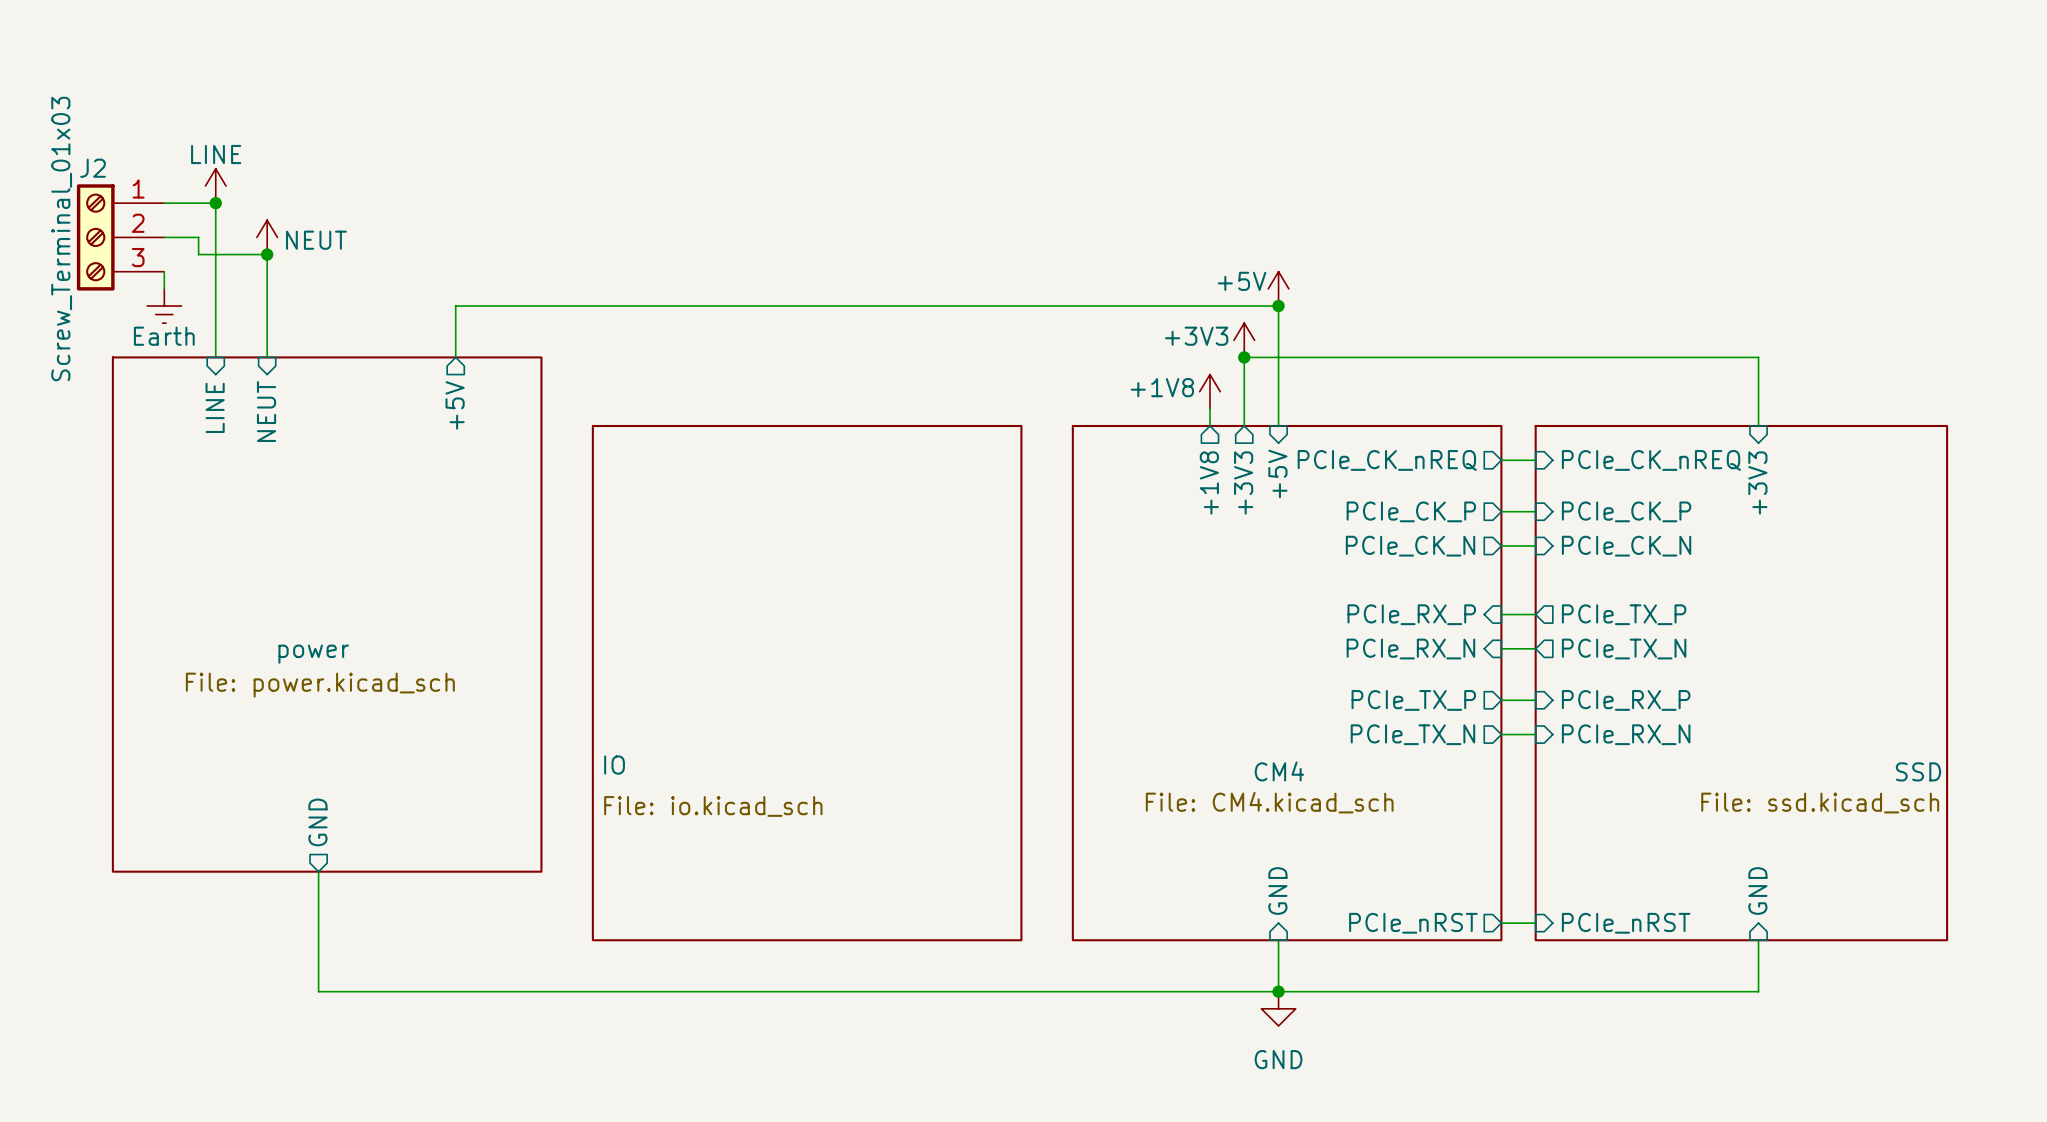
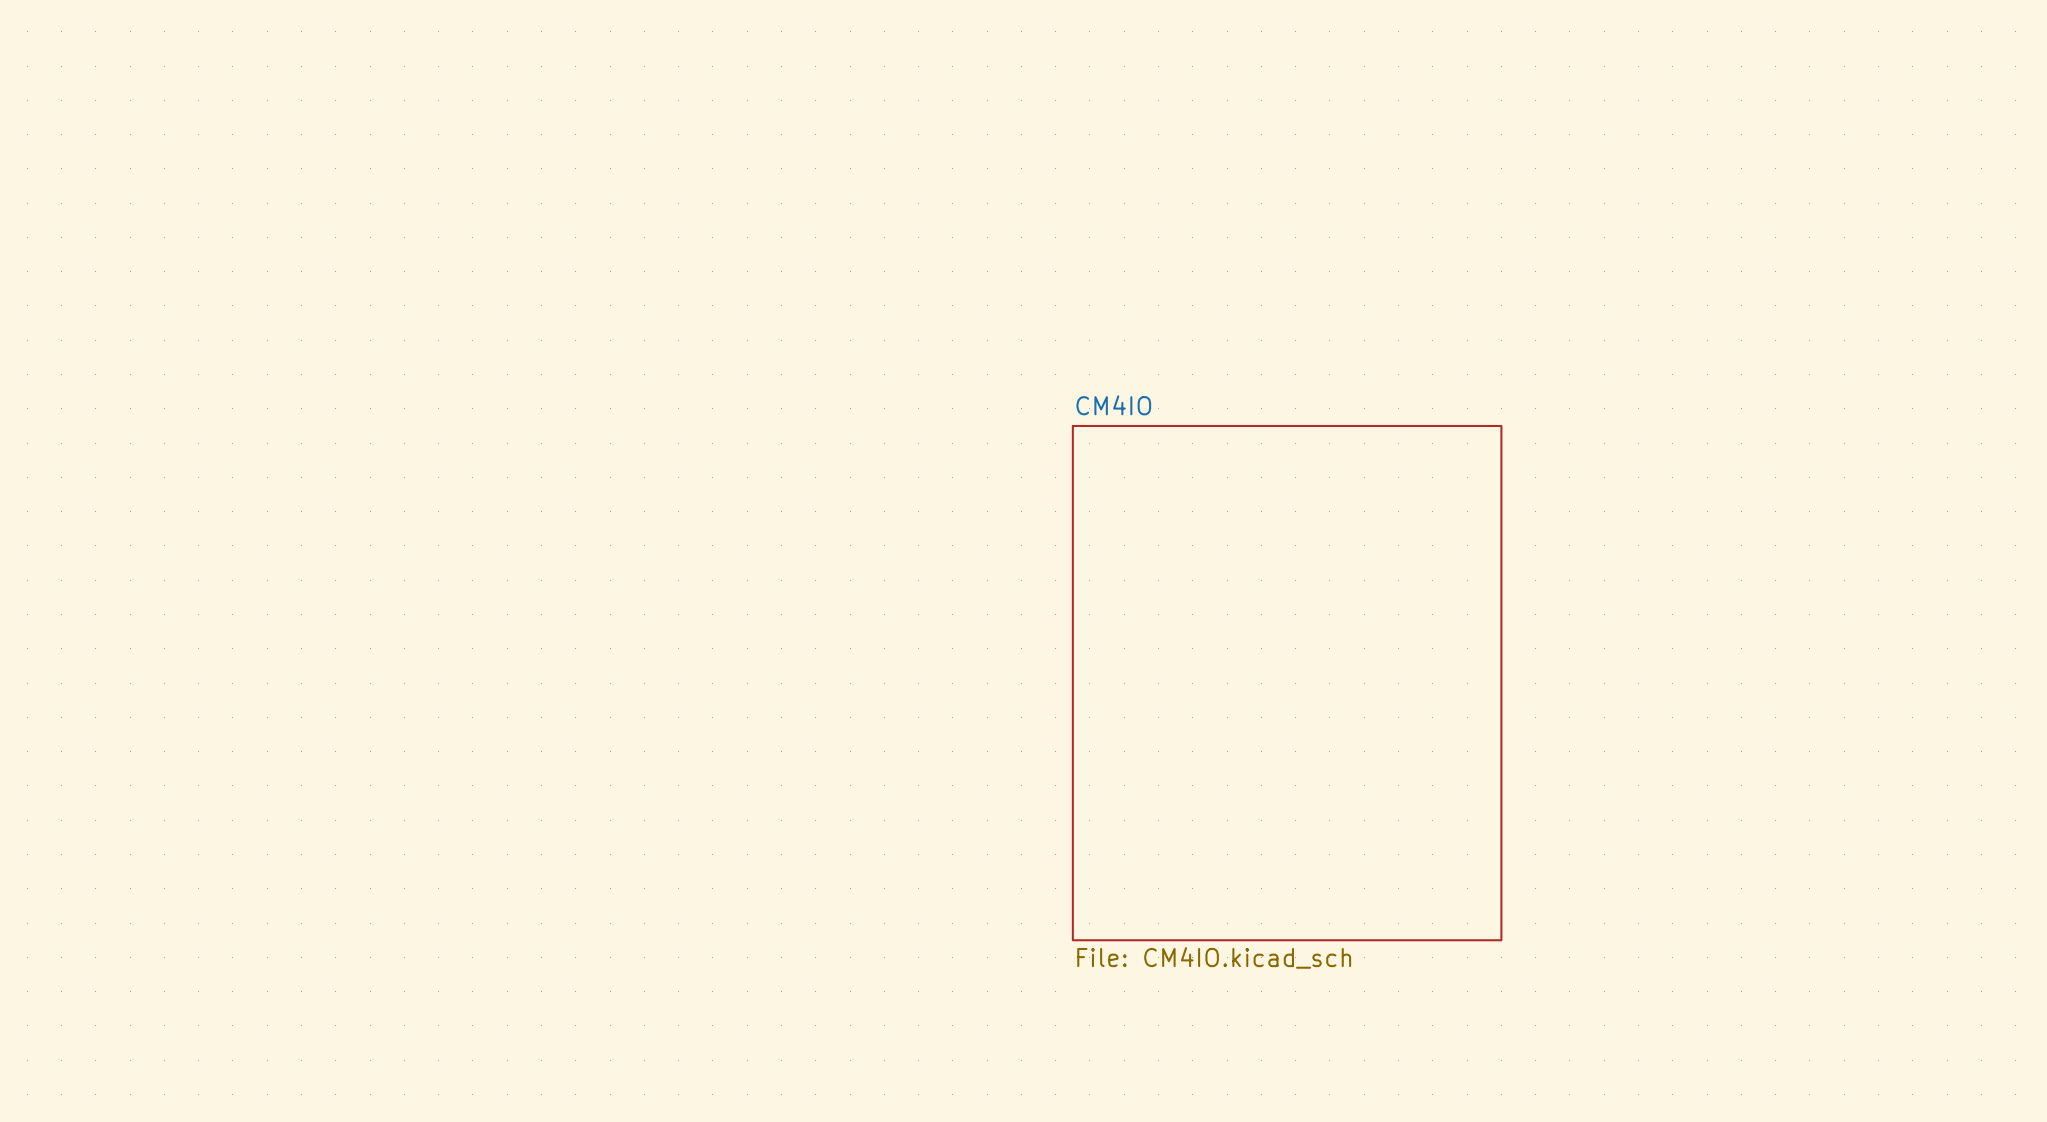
power symbol: LINE (215, 186) -> none
wire: (164, 203) (215, 203) (215, 357) -> none
junction: (215, 203) -> none
J2: Screw_Terminal_01x03 (120, 237) -> none
wire: (164, 237) (198, 237) (198, 254) (267, 254) (267, 357) -> none
power symbol: NEUT (267, 237) -> none
junction: (267, 254) -> none
wire: (164, 271) (164, 288) -> none
power symbol: +5V (1278, 288) -> none
power symbol: Earth (164, 305) -> none
junction: (1278, 305) -> none
power symbol: +3V3 (1244, 340) -> none
wire: (455, 357) (455, 305) (1278, 305) (1278, 425) -> none
junction: (1244, 357) -> none
power symbol: +1V8 (1209, 391) -> none
sheet pin: +5V (455, 405) -> none
sheet pin: LINE (215, 407) -> none
wire: (1209, 408) (1209, 425) -> none
sheet pin: NEUT (266, 411) -> none
wire: (1244, 425) (1244, 357) (1758, 357) (1758, 425) -> none
sheet pin: PCIe_CK_nREQ (1387, 460) -> none
wire: (1501, 460) (1535, 460) -> none
sheet pin: PCIe_CK_nREQ (1651, 460) -> none
sheet pin: +5V (1277, 474) -> none
sheet pin: +1V8 (1209, 482) -> none
sheet pin: +3V3 (1243, 482) -> none
sheet pin: +3V3 (1757, 482) -> none
sheet pin: PCIe_CK_P (1411, 511) -> none
wire: (1501, 511) (1535, 511) -> none
sheet pin: PCIe_CK_P (1626, 511) -> none
wire: (1501, 545) (1535, 545) -> none
sheet pin: PCIe_CK_N (1410, 546) -> none
sheet pin: PCIe_CK_N (1626, 546) -> none
sheet power: File: power.kicad_sch (327, 614) -> none
sheet pin: PCIe_RX_P (1411, 614) -> none
wire: (1501, 614) (1535, 614) -> none
sheet pin: PCIe_TX_P (1624, 614) -> none
wire: (1501, 648) (1535, 648) -> none
sheet pin: PCIe_RX_N (1410, 649) -> none
sheet pin: PCIe_TX_N (1624, 649) -> none
sheet IO: File: io.kicad_sch (807, 683) -> none
sheet SSD: File: ssd.kicad_sch (1741, 683) -> none
sheet pin: PCIe_TX_P (1413, 700) -> none
wire: (1501, 700) (1535, 700) -> none
sheet pin: PCIe_RX_P (1626, 700) -> none
sheet pin: PCIe_TX_N (1412, 734) -> none
wire: (1501, 734) (1535, 734) -> none
sheet pin: PCIe_RX_N (1626, 734) -> none
sheet CM4 name: CM4 (1279, 771) -> CM4IO (1113, 405)
sheet CM4 value: File: CM4.kicad_sch (1269, 802) -> File: CM4IO.kicad_sch (1214, 957)
sheet pin: GND (317, 822) -> none
wire: (318, 871) (318, 991) (1758, 991) (1758, 940) -> none
sheet pin: GND (1277, 891) -> none
sheet pin: GND (1757, 891) -> none
sheet pin: PCIe_nRST (1413, 923) -> none
wire: (1501, 923) (1535, 923) -> none
sheet pin: PCIe_nRST (1626, 923) -> none
wire: (1278, 940) (1278, 991) -> none
junction: (1278, 991) -> none
power symbol: GND (1278, 1008) -> none

